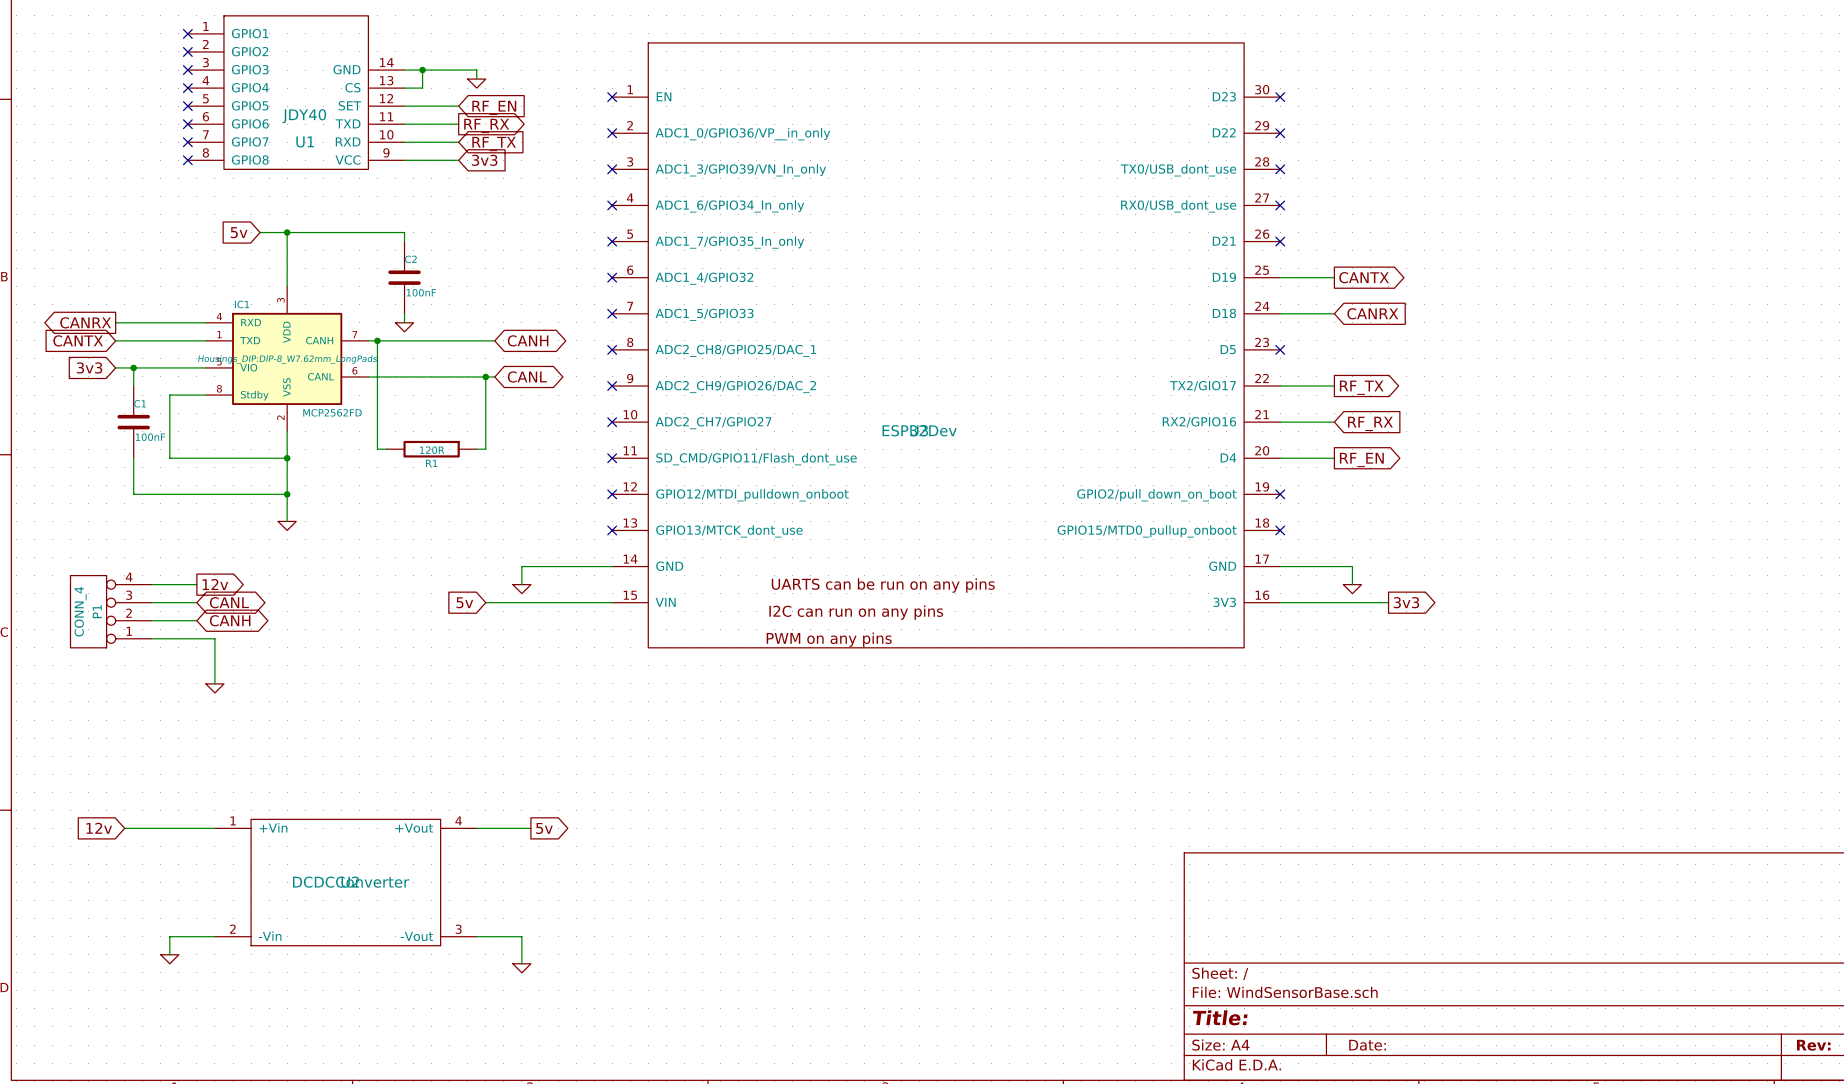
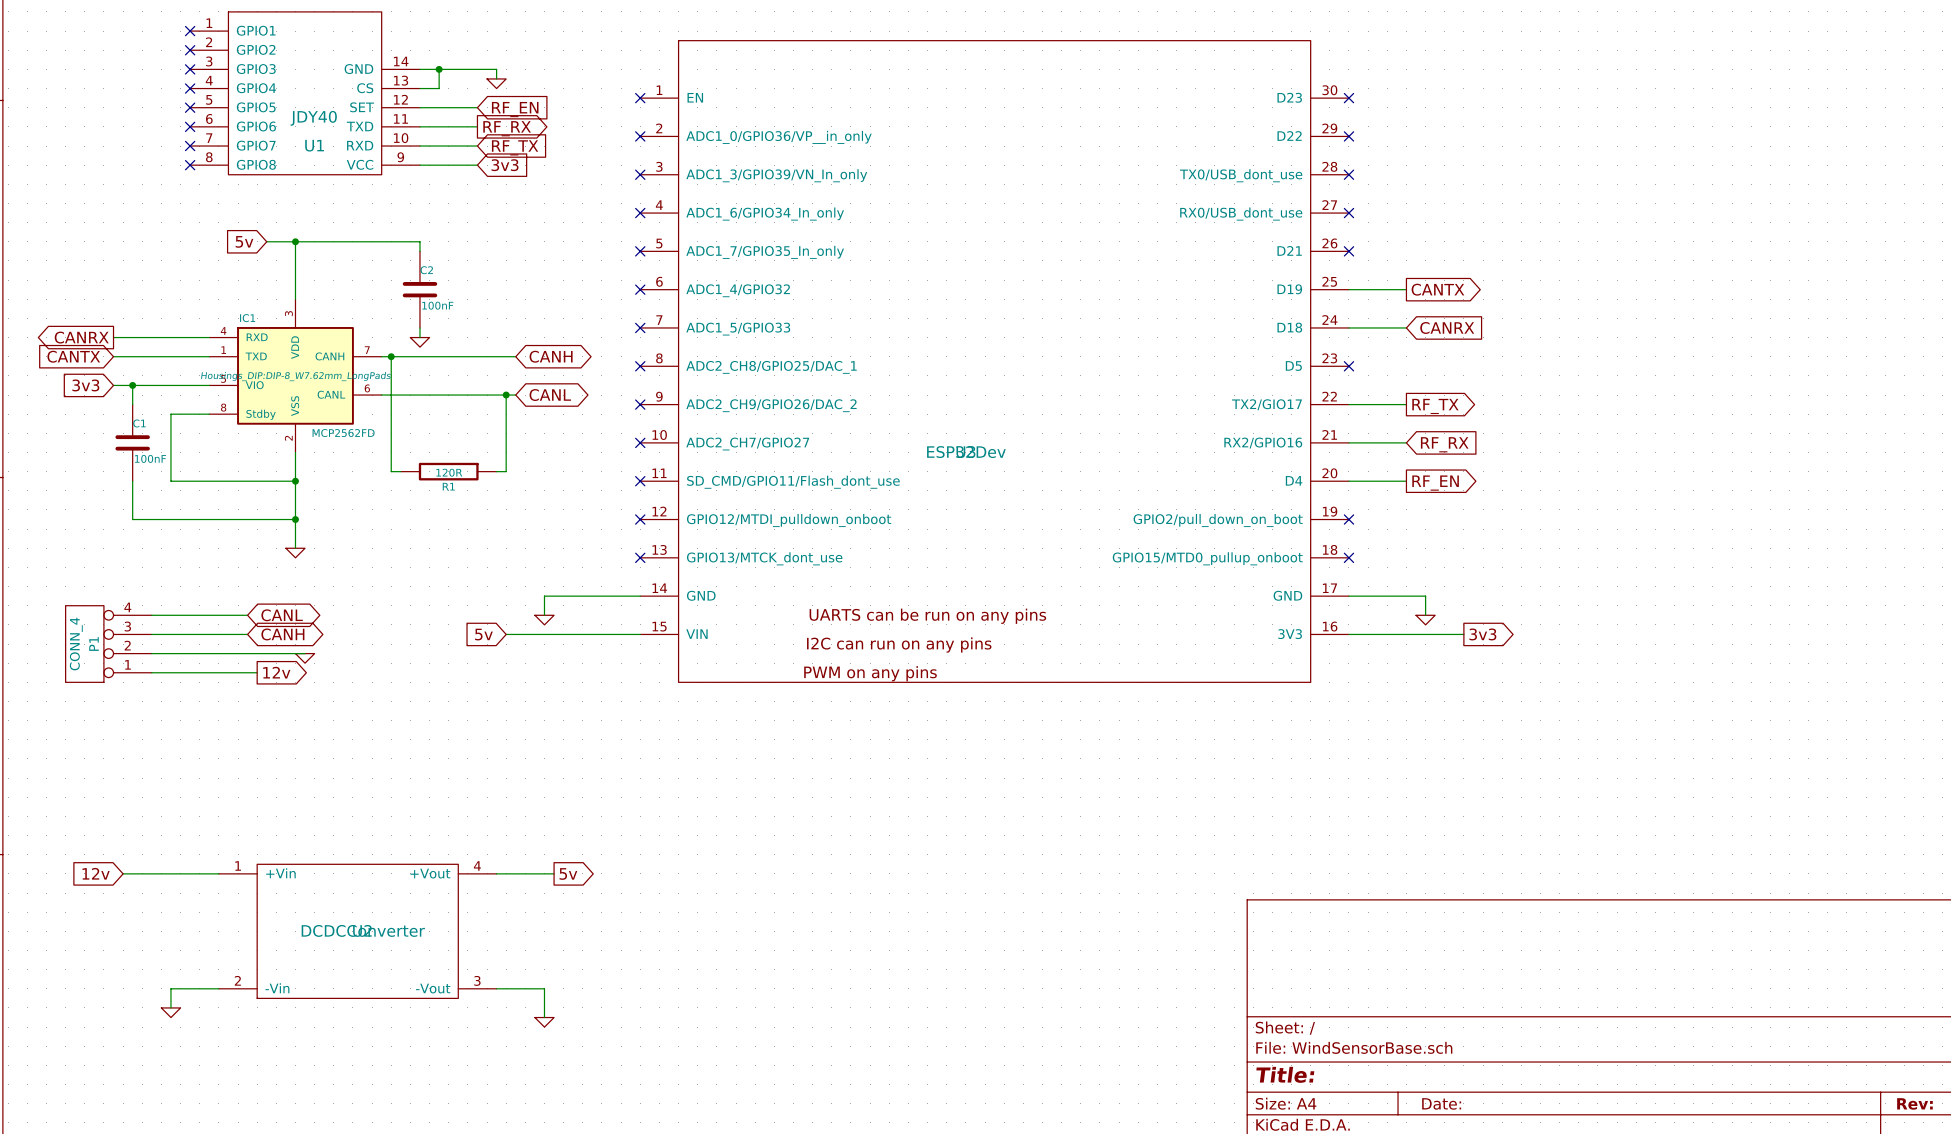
wire: none -> (199, 615) (247, 615)
global label position: 12v (215, 584) -> 12v (276, 672)
wire: none -> (199, 634) (247, 634)
global label position: CANL (229, 602) -> CANL (282, 615)
wire: none -> (199, 653) (305, 653)
global label position: CANH (230, 620) -> CANH (282, 634)
wire: (214, 638) (214, 683) -> (218, 672) (257, 672)
power symbol position: (214, 688) -> (305, 658)

